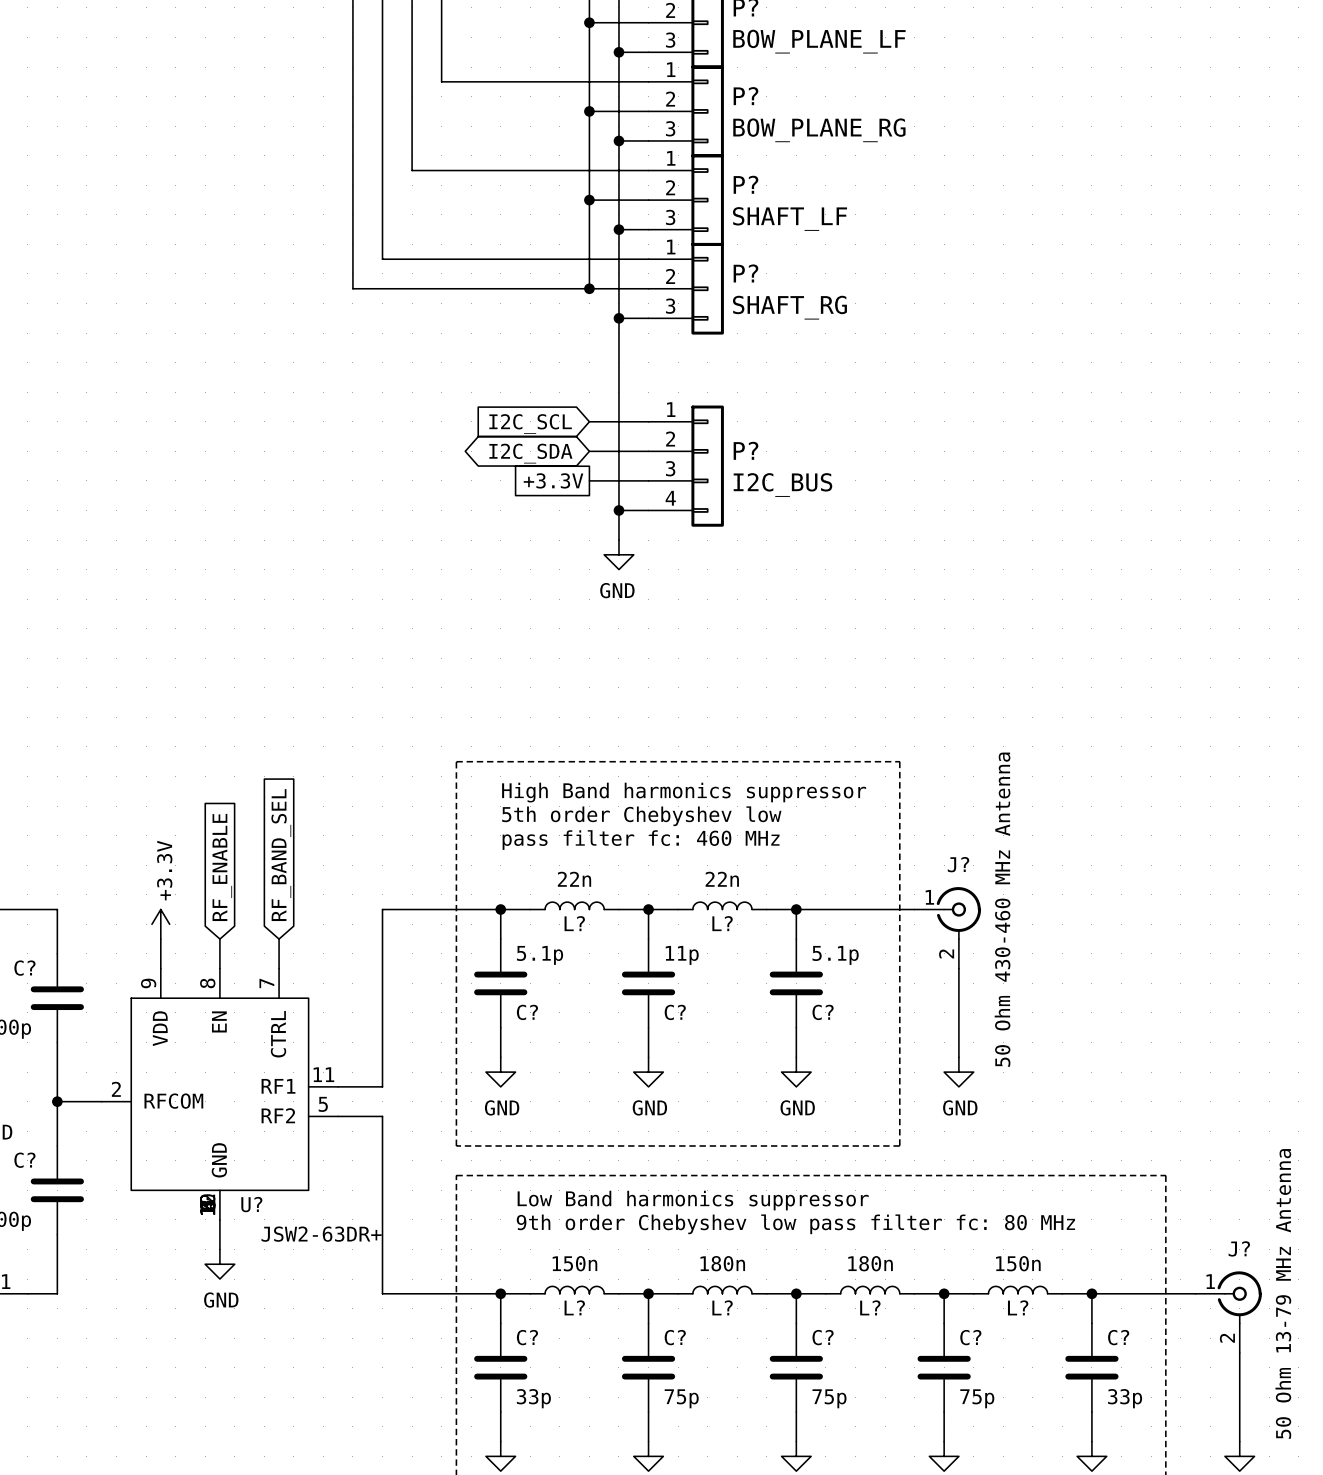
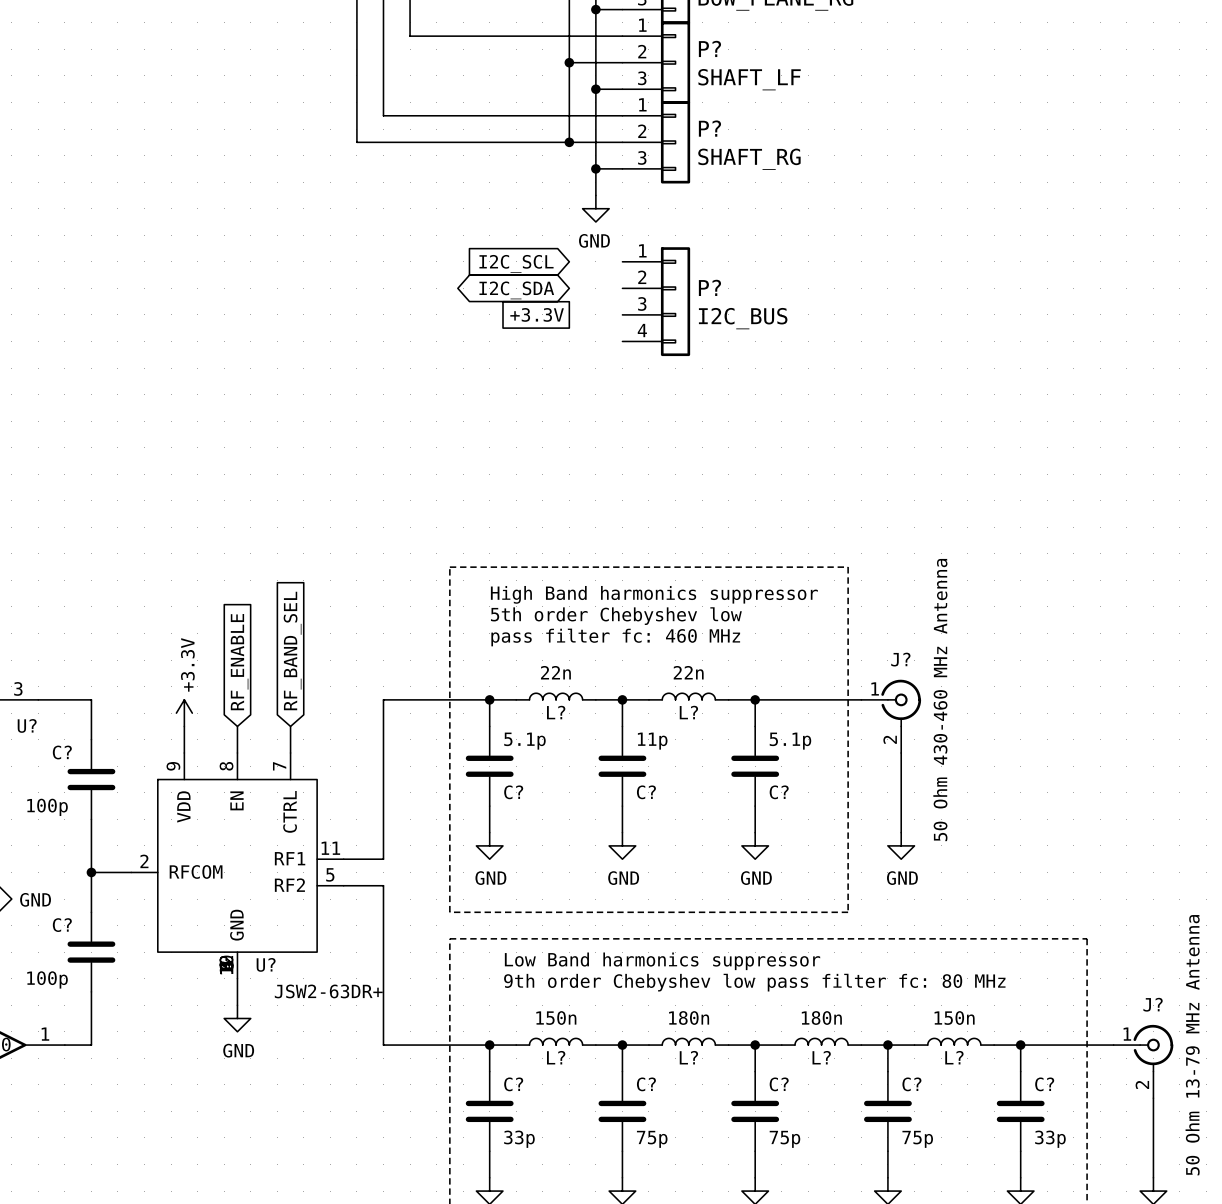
wire: (618, 347) (618, 540) -> none
wire: (589, 421) (648, 421) -> none
wire: (589, 451) (648, 451) -> none
wire: (589, 480) (648, 480) -> none
wire: (618, 510) (648, 510) -> none
junction: (618, 510) -> none
power symbol position: GND (618, 554) -> GND (595, 208)

